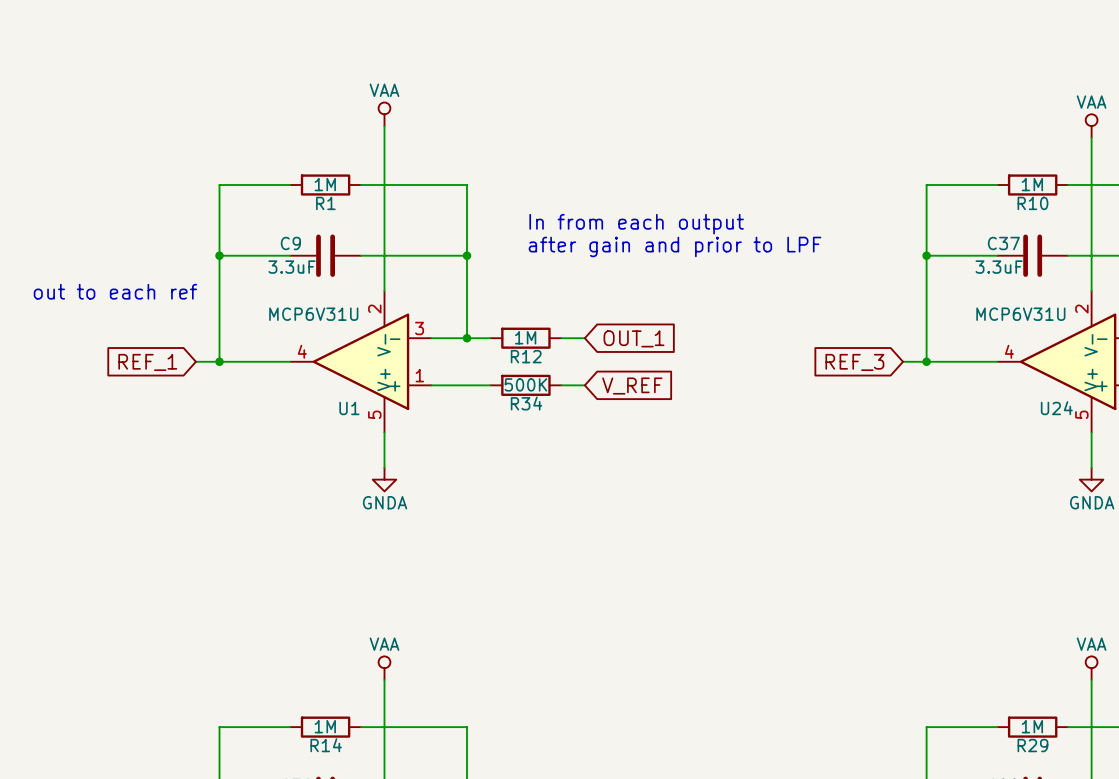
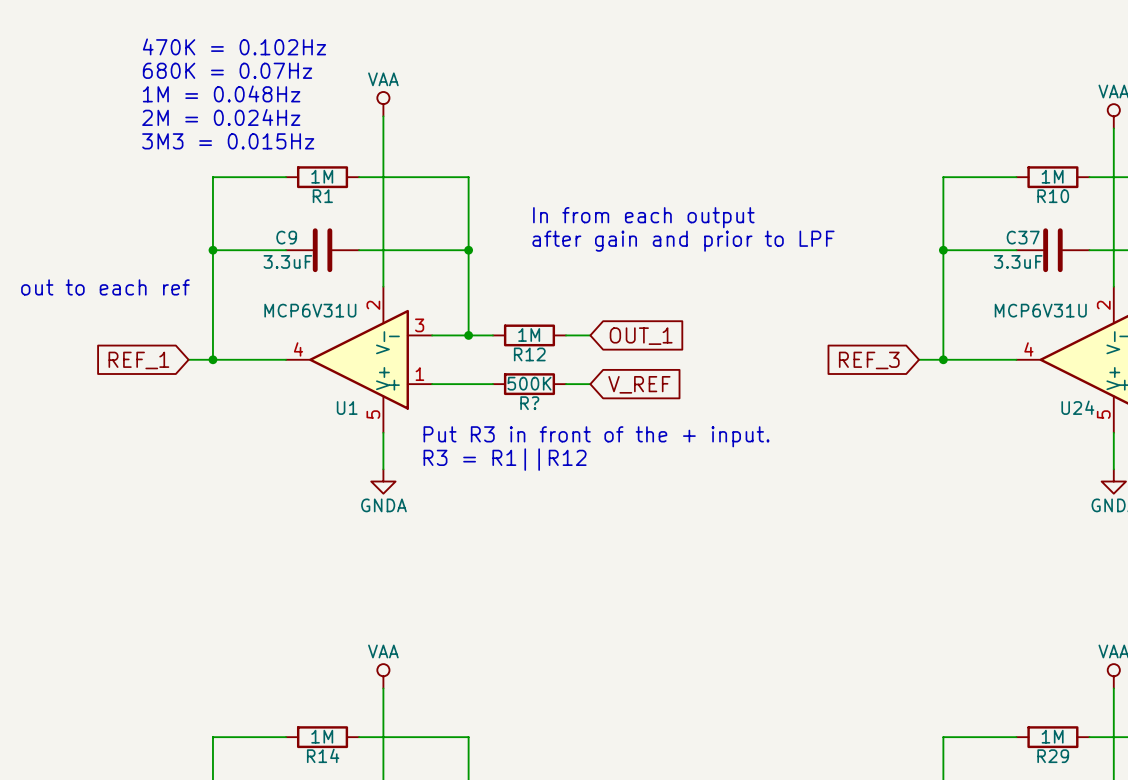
text: none -> 470K = 0.102Hz (234, 46)
text: none -> 680K = 0.07Hz (227, 70)
text: none -> 1M = 0.048Hz (221, 93)
text: none -> 2M = 0.024Hz (221, 117)
text: none -> 3M3 = 0.015Hz (228, 141)
R34 name: R34 (526, 403) -> R? (529, 403)
text: none -> Put R3 in front of the + input. (596, 436)
text: none -> R3 = R1||R12 (505, 459)

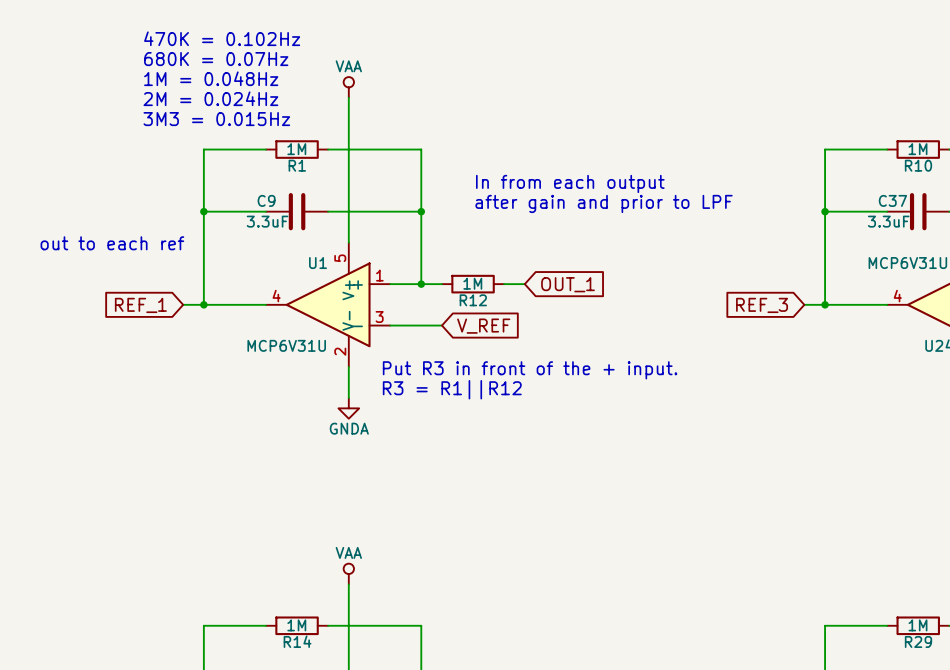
U1 flip: as is (359, 359) -> up-down (328, 304)
R?: 500K (529, 384) -> none
wire: (566, 384) (590, 384) -> none
global label position: V_REF (639, 384) -> V_REF (483, 326)

